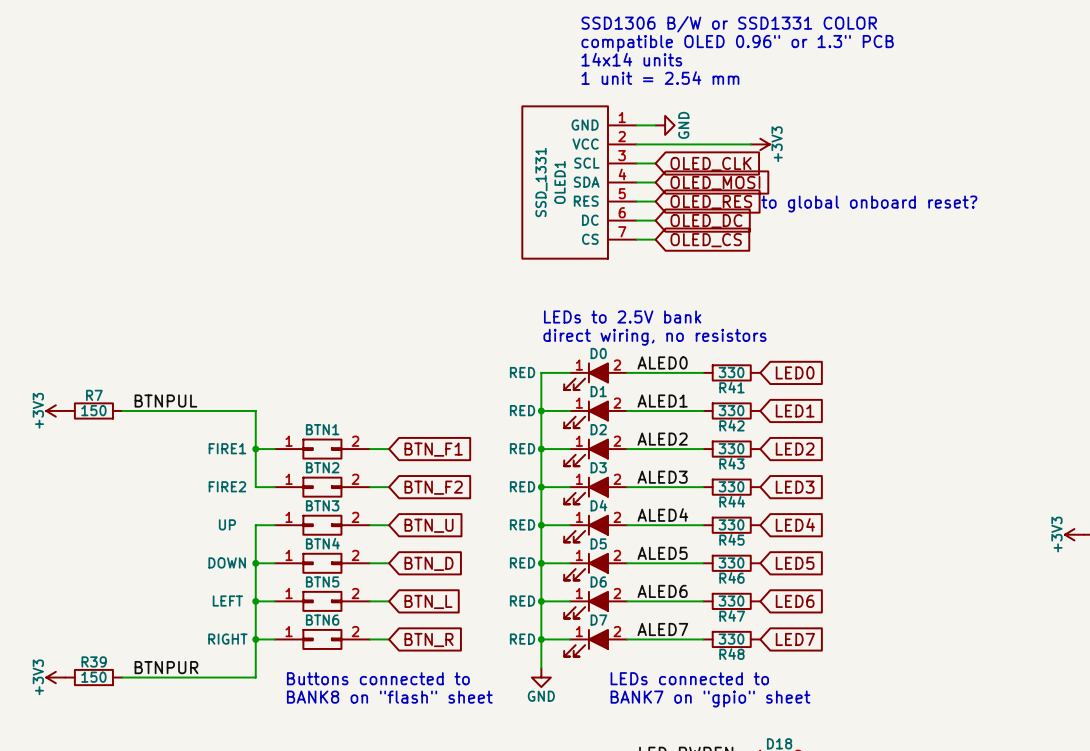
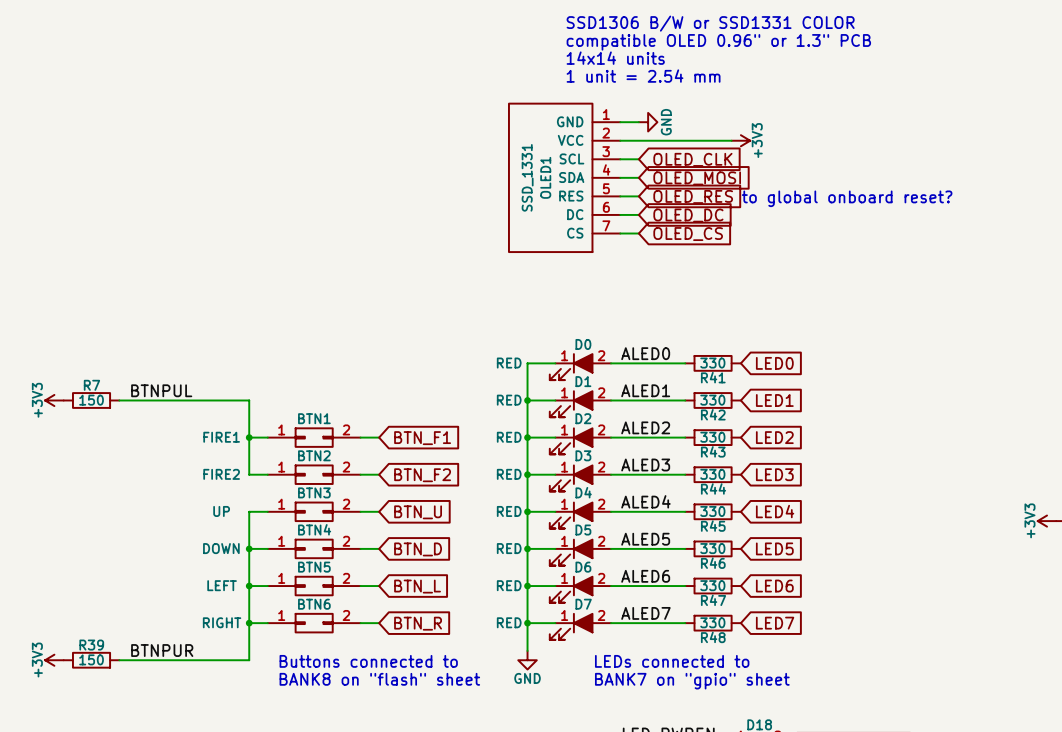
text: LEDs to 2.5V bank (622, 316) -> none
text: direct wiring, no resistors (654, 337) -> none

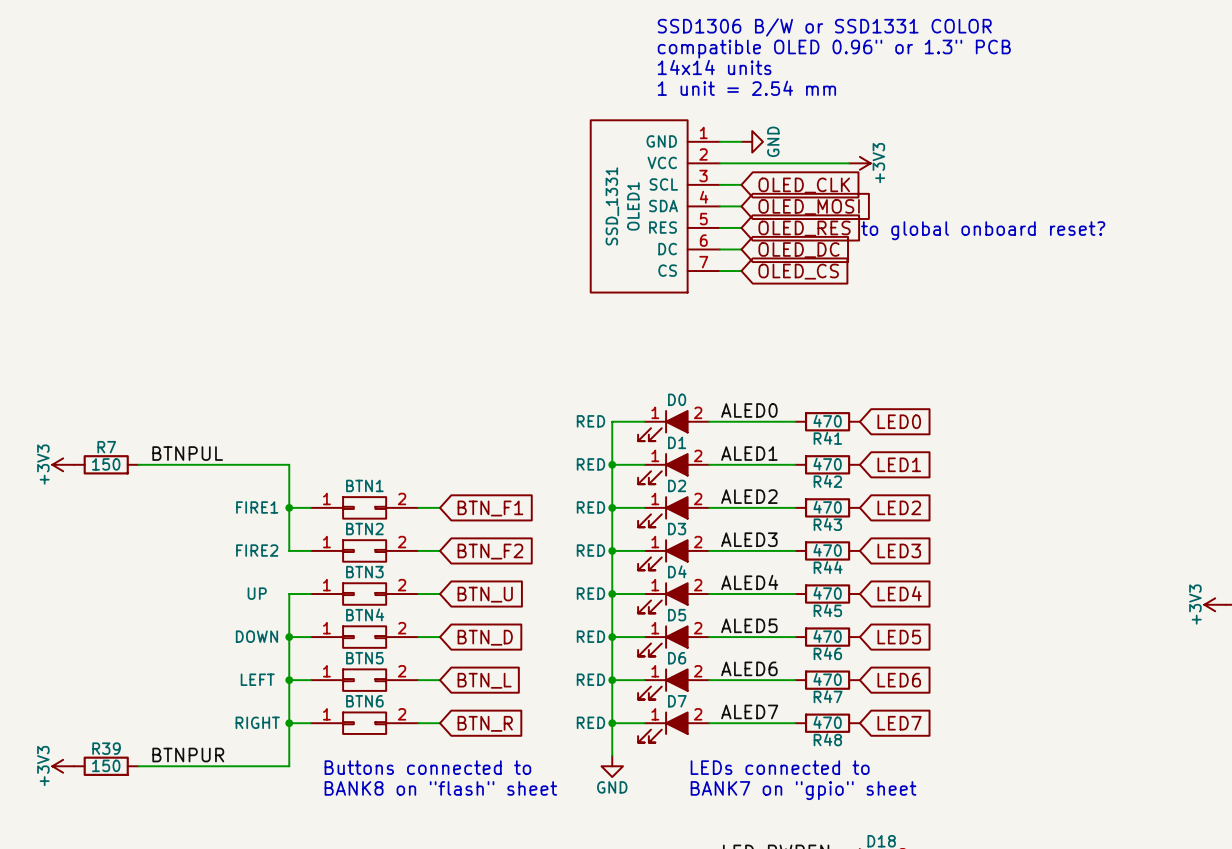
R41 value: 330 (712, 363) -> 470 (827, 421)
R42 value: 330 (712, 400) -> 470 (827, 464)
R43 value: 330 (712, 437) -> 470 (827, 507)
R44 value: 330 (712, 474) -> 470 (827, 550)
R45 value: 330 (712, 511) -> 470 (827, 593)
R46 value: 330 (712, 548) -> 470 (827, 636)
R47 value: 330 (712, 585) -> 470 (827, 679)
R48 value: 330 (712, 622) -> 470 (827, 722)

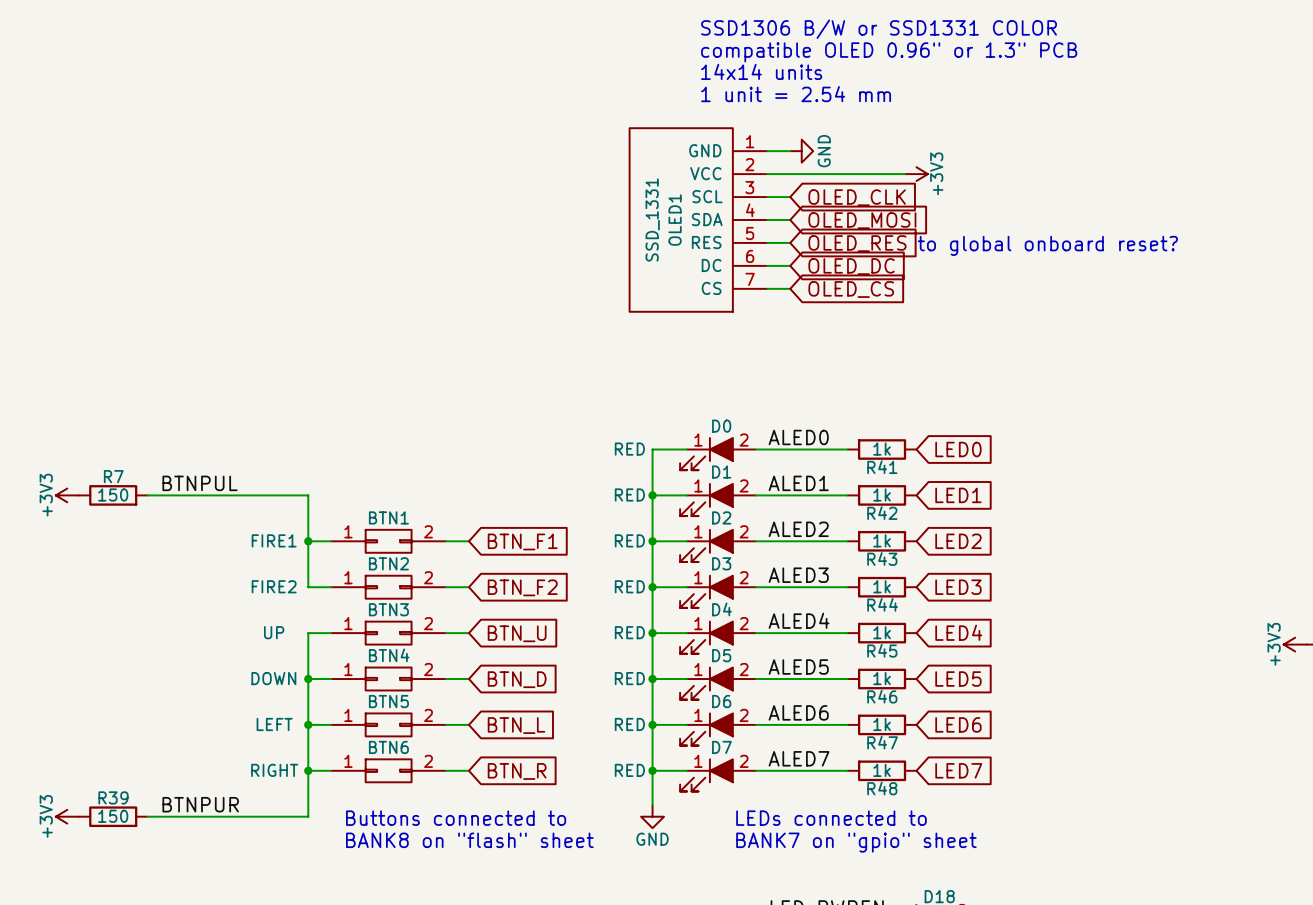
R41 value: 470 (827, 421) -> 1k (882, 449)
R42 value: 470 (827, 464) -> 1k (882, 494)
R43 value: 470 (827, 507) -> 1k (882, 540)
R44 value: 470 (827, 550) -> 1k (882, 586)
R45 value: 470 (827, 593) -> 1k (882, 632)
R46 value: 470 (827, 636) -> 1k (882, 678)
R47 value: 470 (827, 679) -> 1k (882, 724)
R48 value: 470 (827, 722) -> 1k (882, 770)

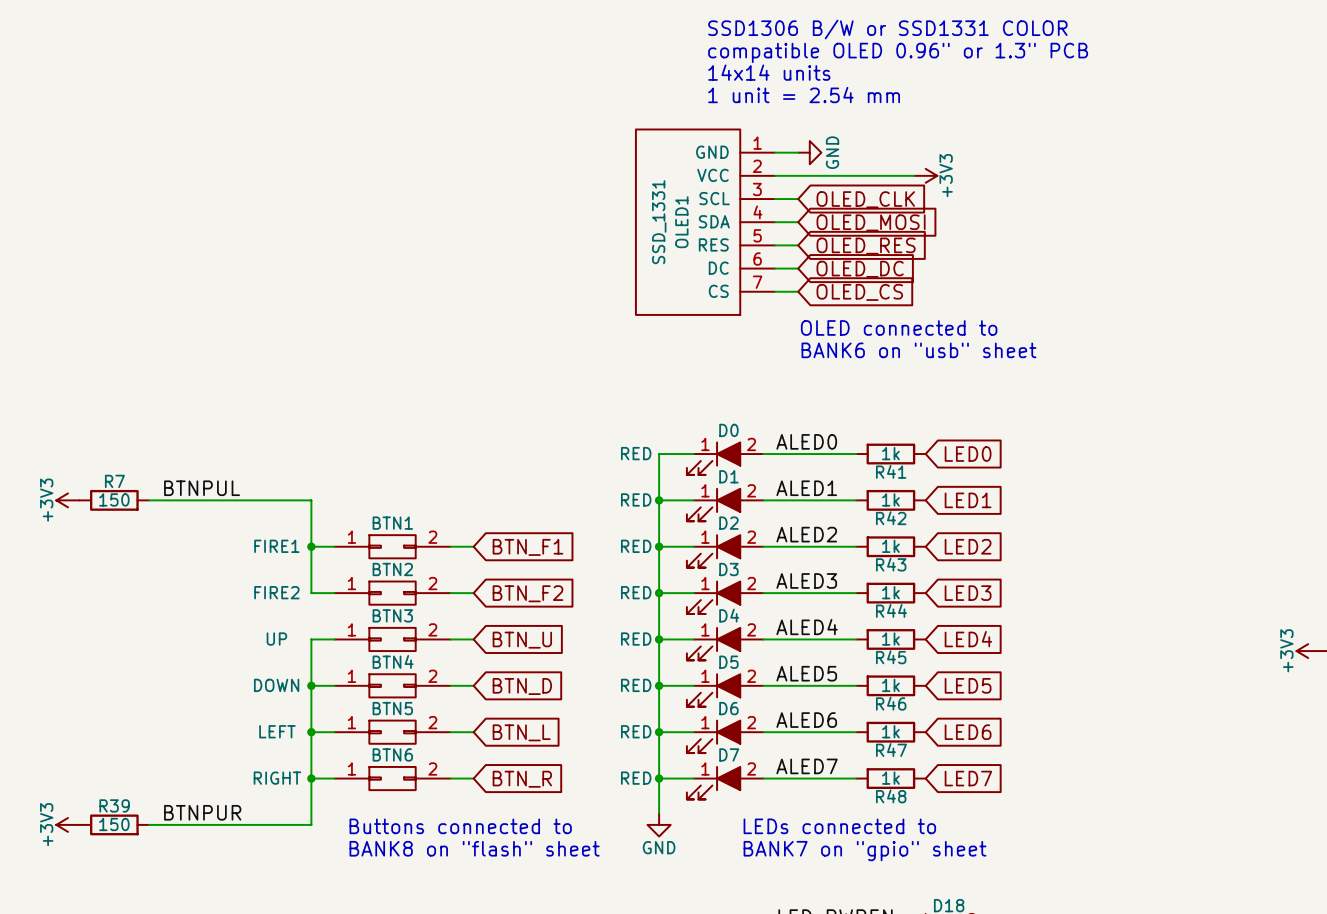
text: to global onboard reset? (1047, 245) -> none
text: none -> OLED connected to (899, 327)
text: none -> BANK6 on "usb" sheet (918, 350)

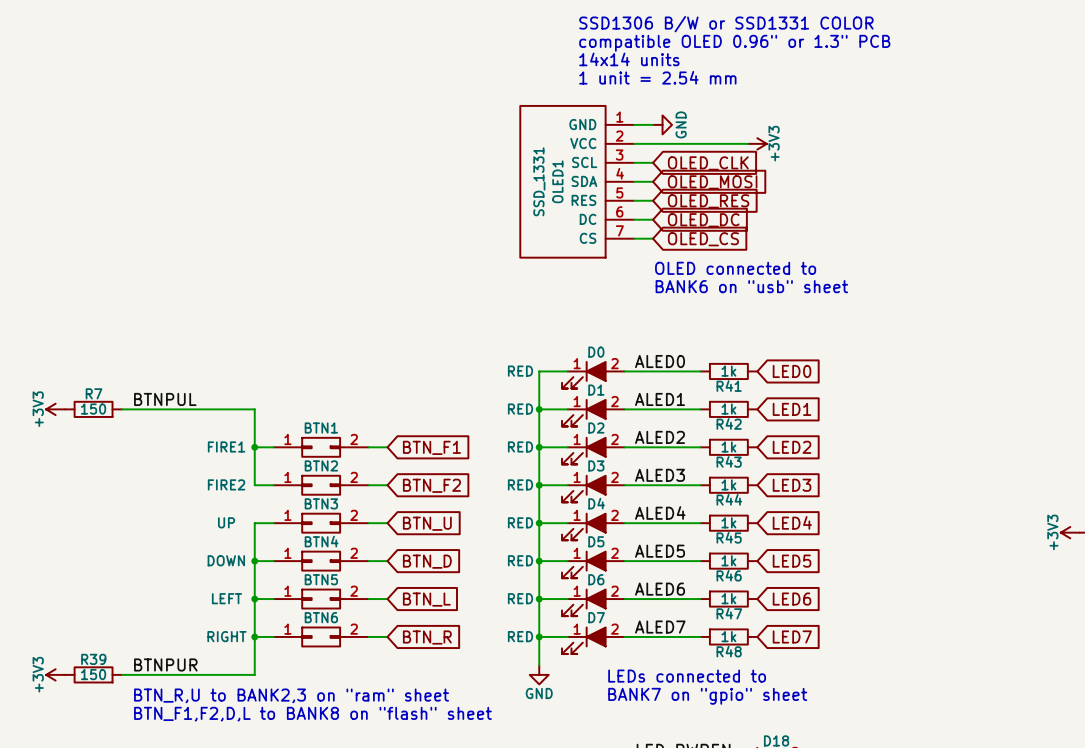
text: Buttons connected to (460, 826) -> none
text: BANK8 on "flash" sheet (474, 848) -> none
text: none -> BTN_R,U to BANK2,3 on "ram" sheet (291, 695)
text: none -> BTN_F1,F2,D,L to BANK8 on "flash" sheet (312, 714)

